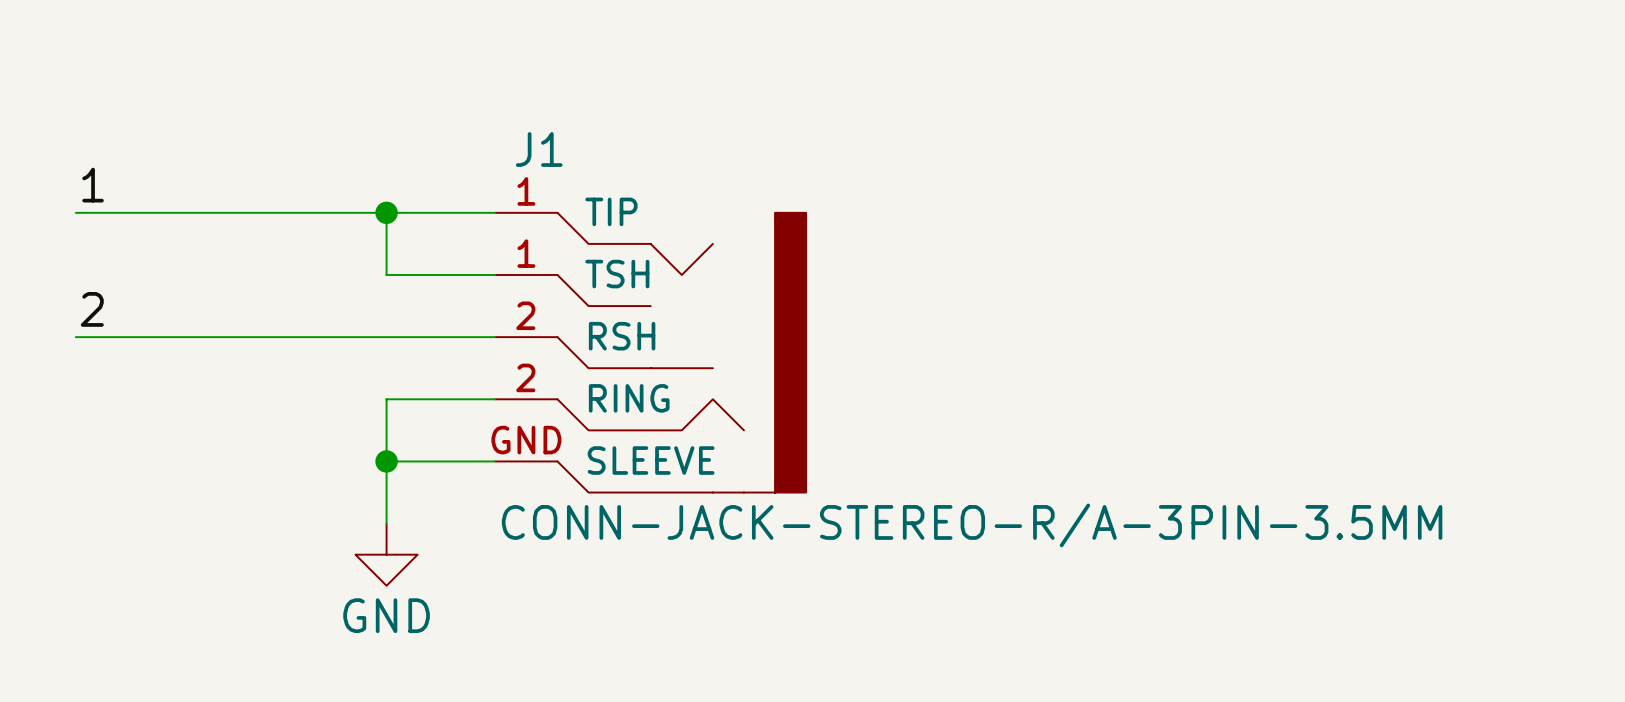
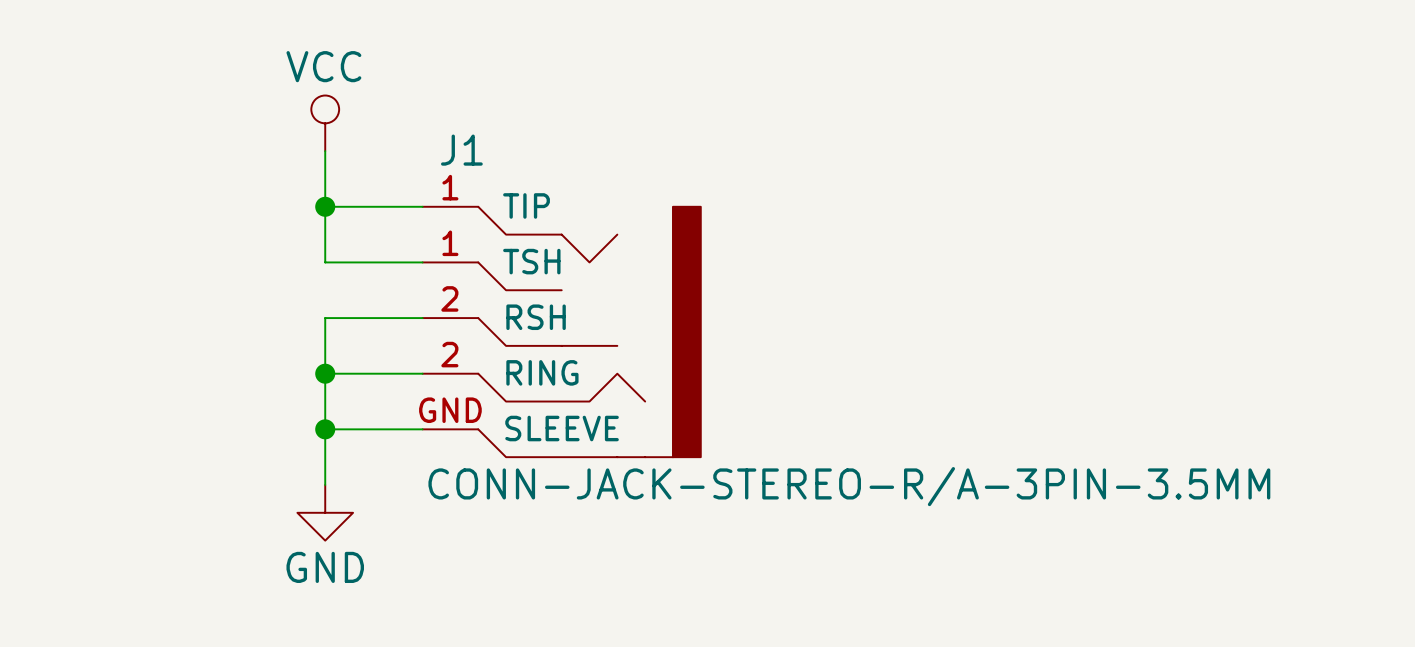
power symbol: none -> VCC (325, 123)
label: 1 (93, 185) -> none
wire: (75, 212) (386, 212) -> (325, 151) (325, 206)
label: 2 (92, 309) -> none
wire: (75, 337) (386, 337) -> (325, 373) (325, 318)
junction: none -> (325, 373)

